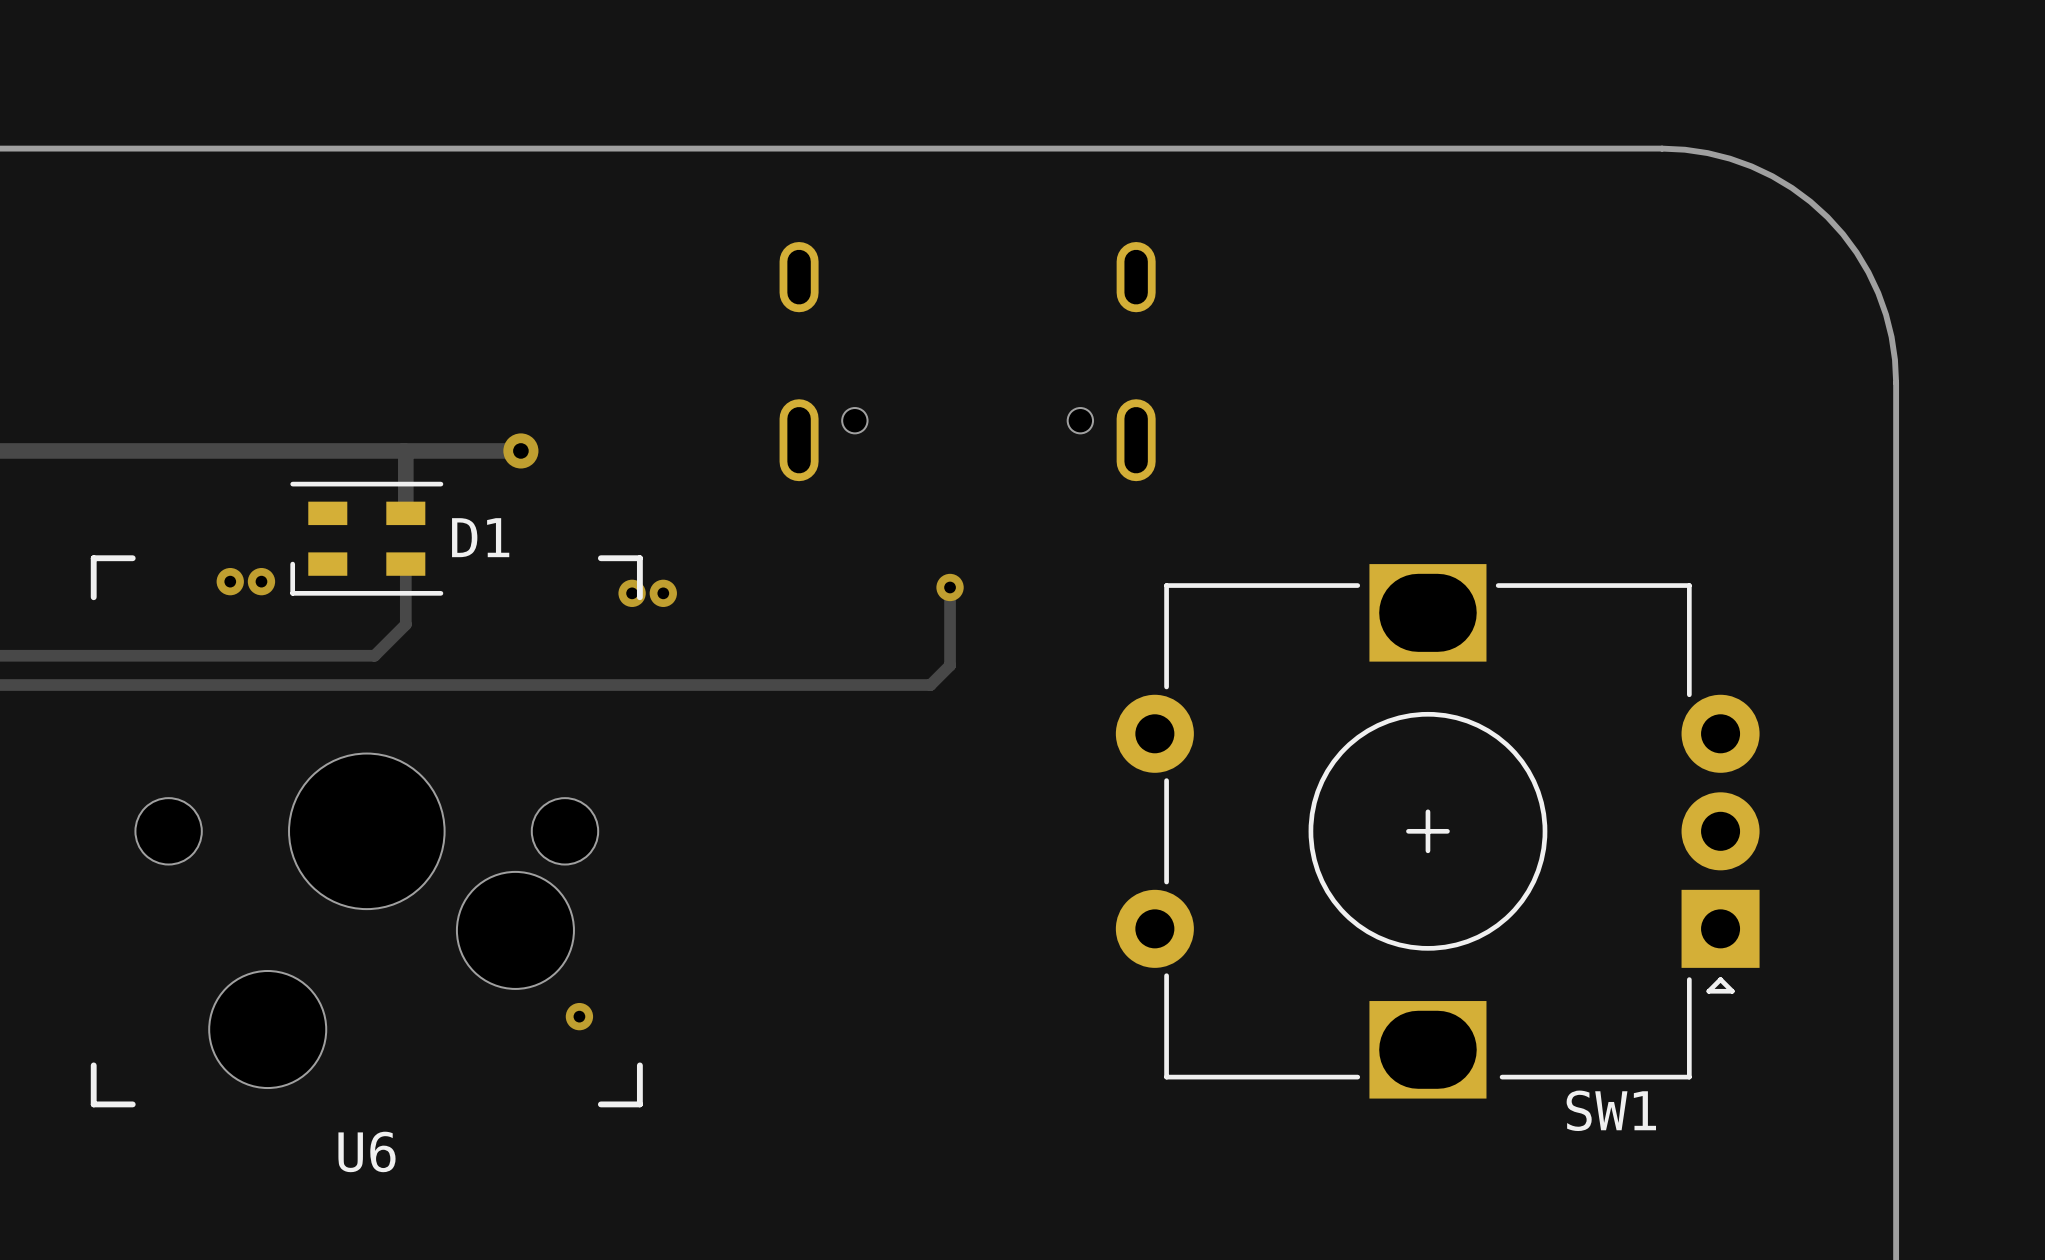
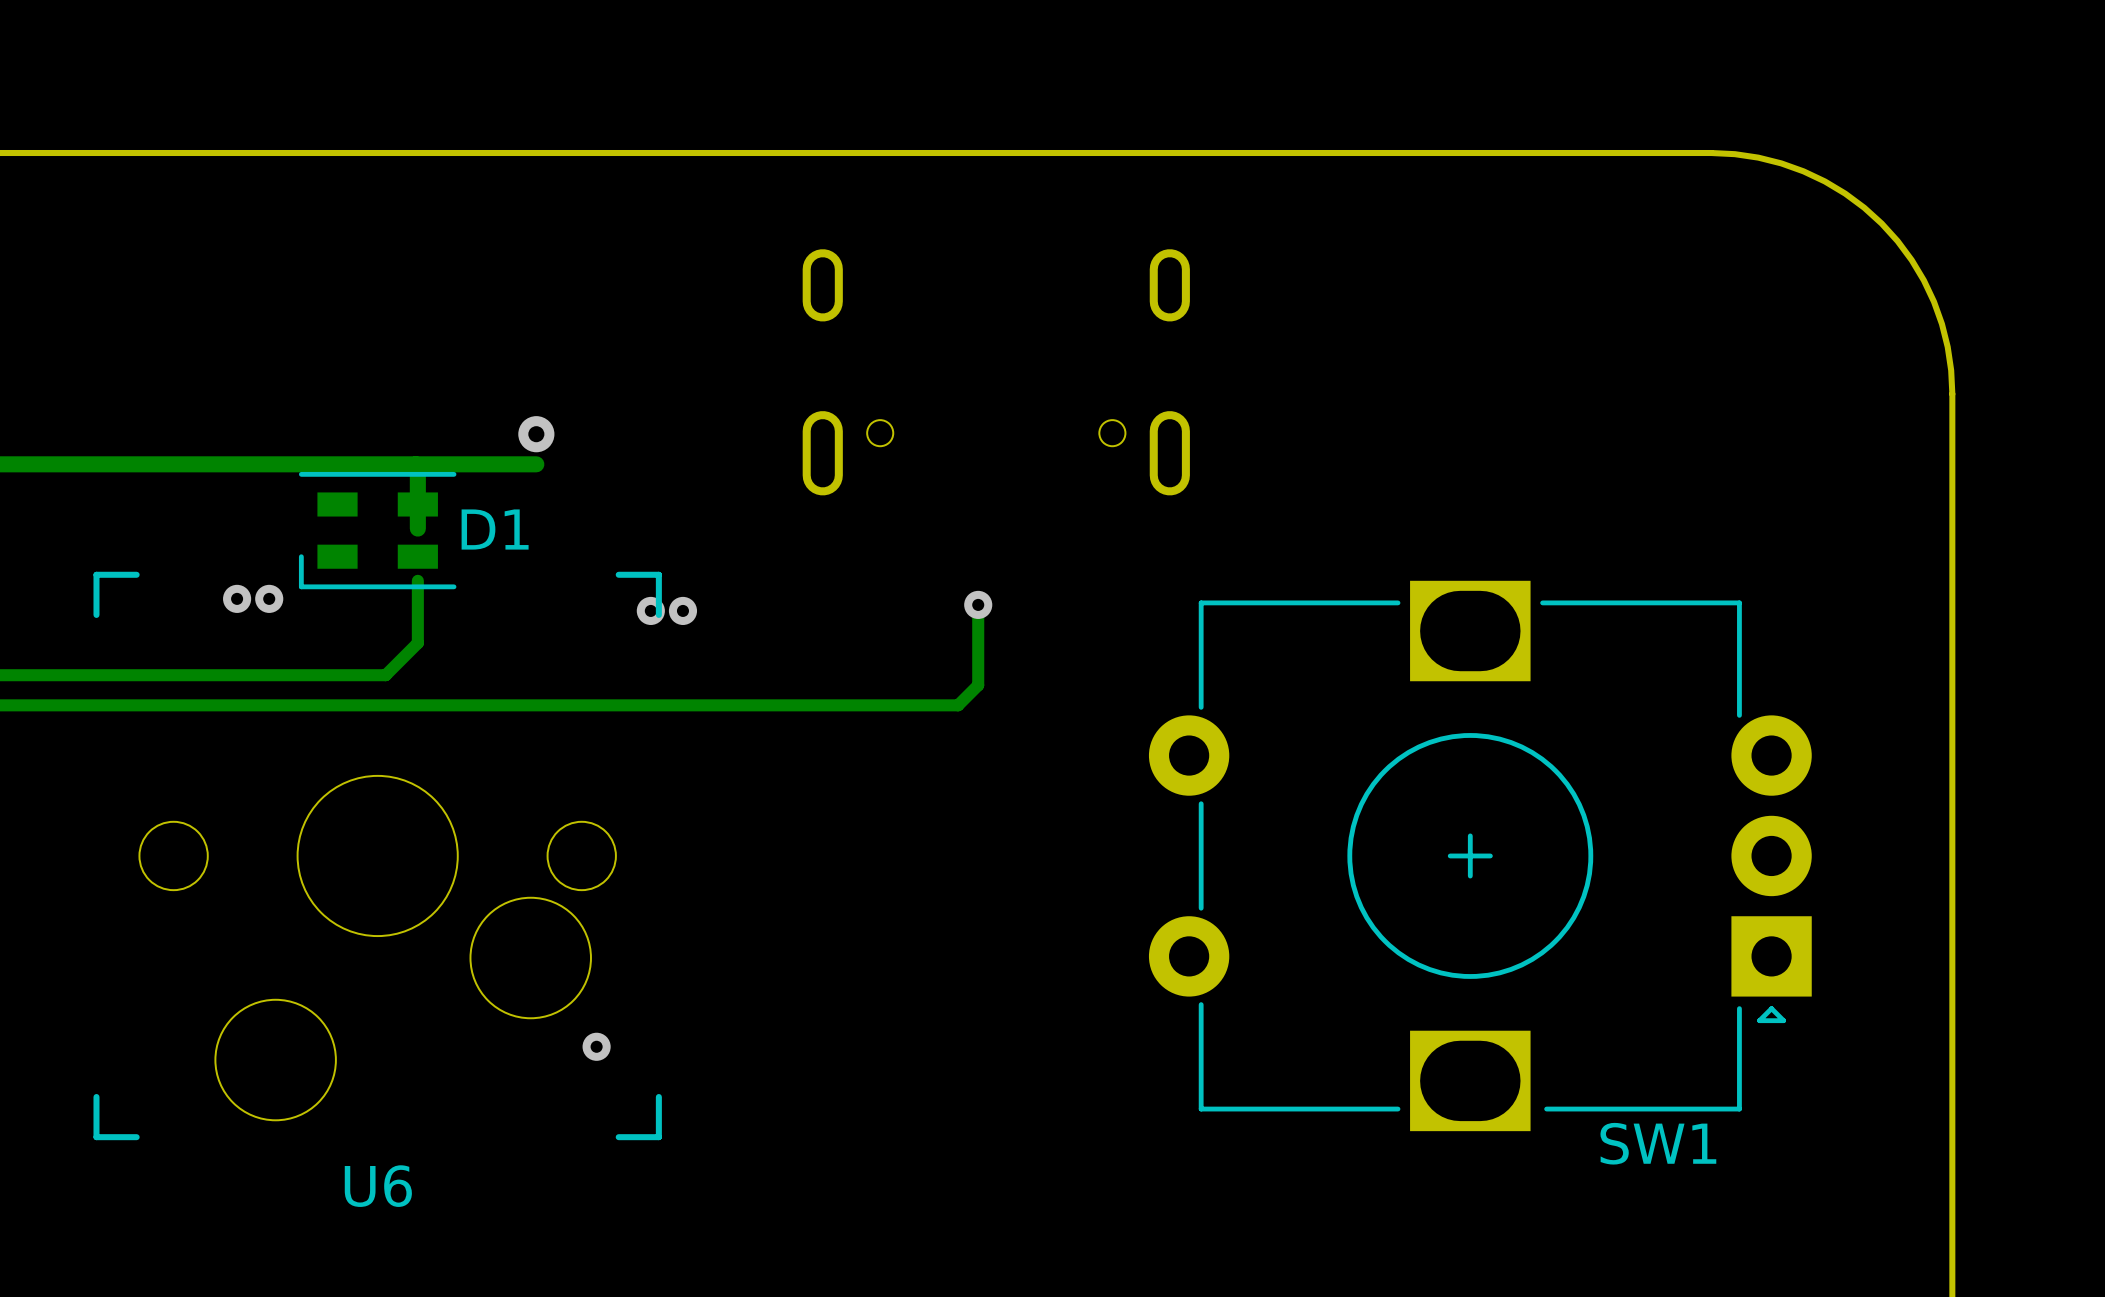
via position: (520, 450) -> (536, 434)
D1 position: (366, 538) -> (377, 530)

